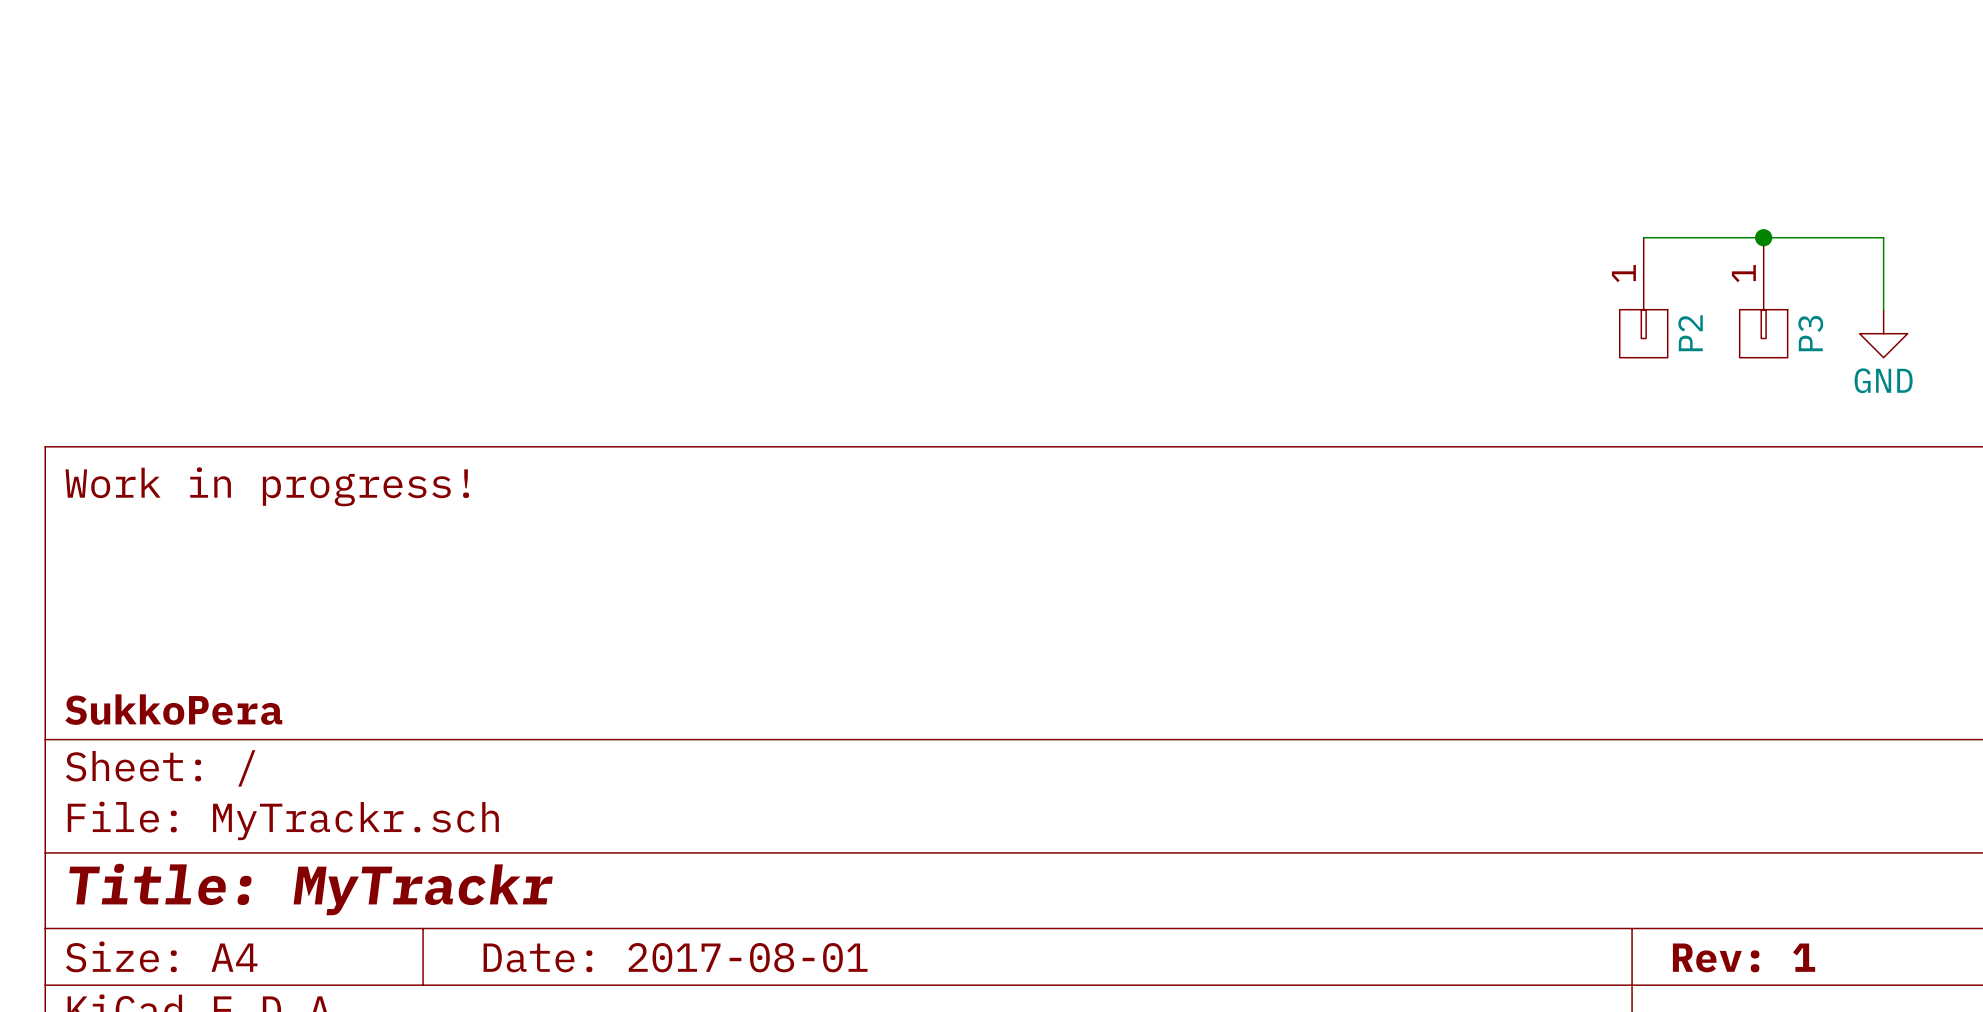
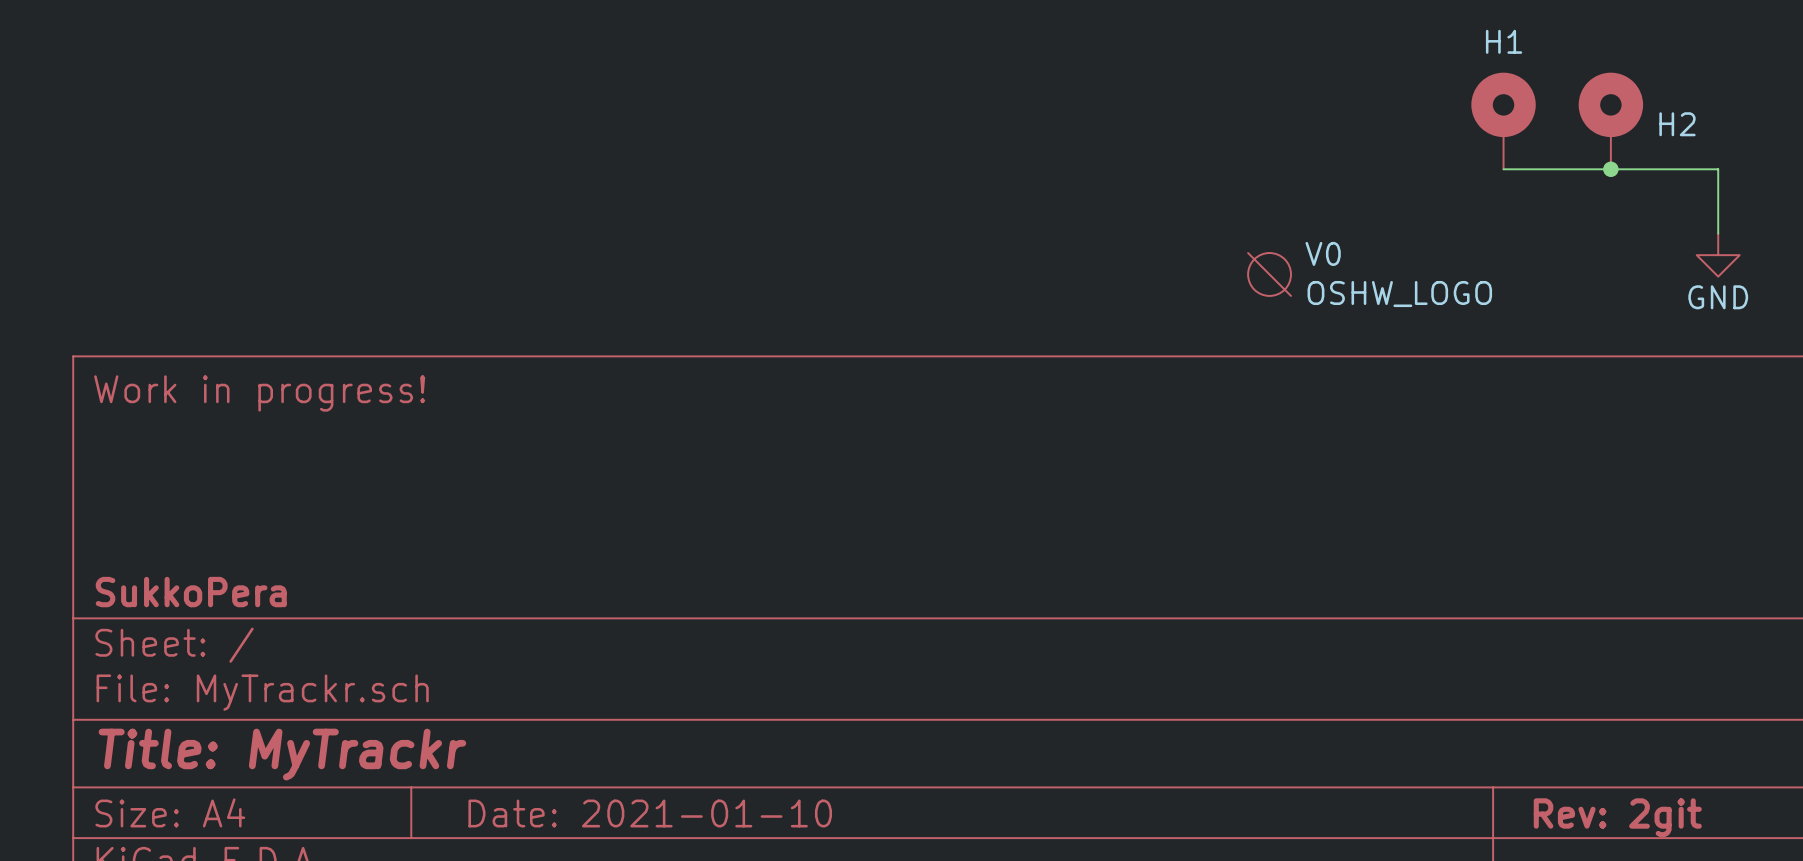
H1: none -> (1503, 120)
H2: none -> (1610, 120)
P2: (1643, 297) -> none
P3: (1763, 297) -> none
V0: none -> OSHW_LOGO (1269, 274)
title block: Date: 2017-08-01 (675, 957) -> Date: 2021-01-10 (650, 813)
title block: Rev: 1 (1744, 957) -> Rev: 2git (1617, 817)

